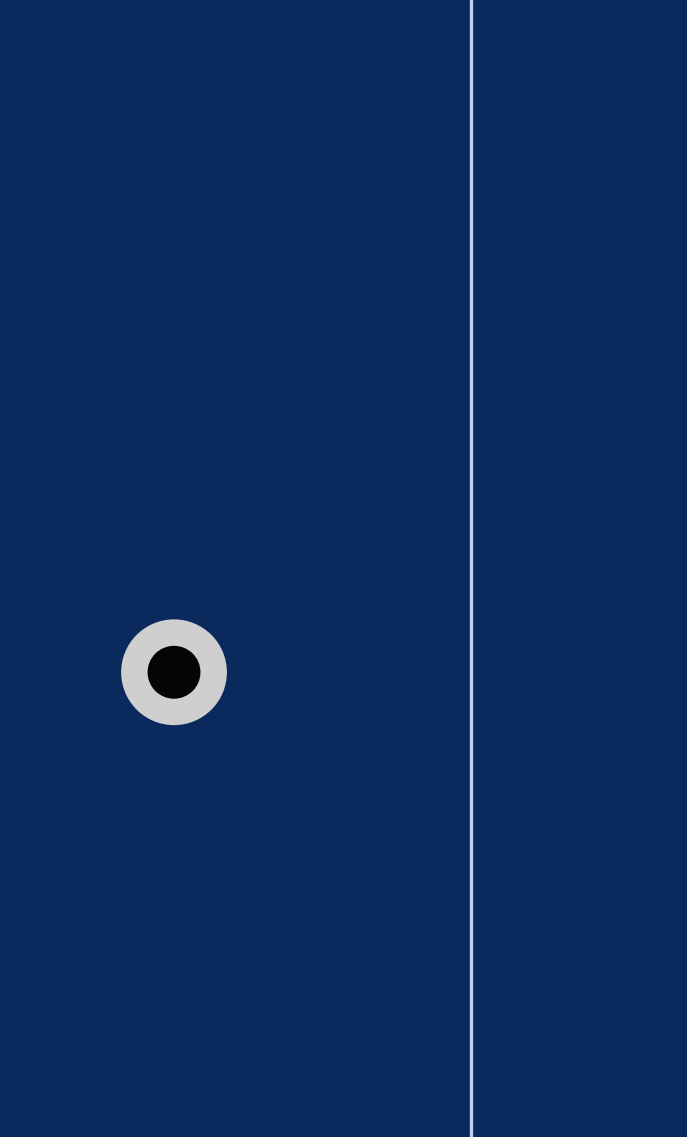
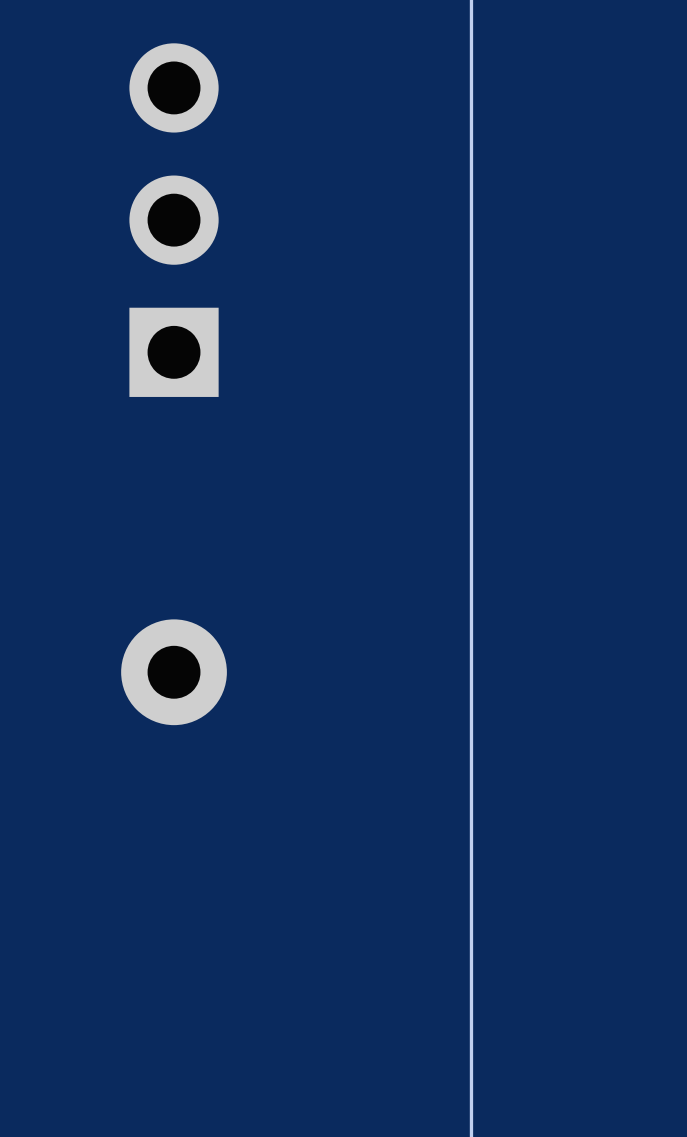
part: none -> (174, 220)

